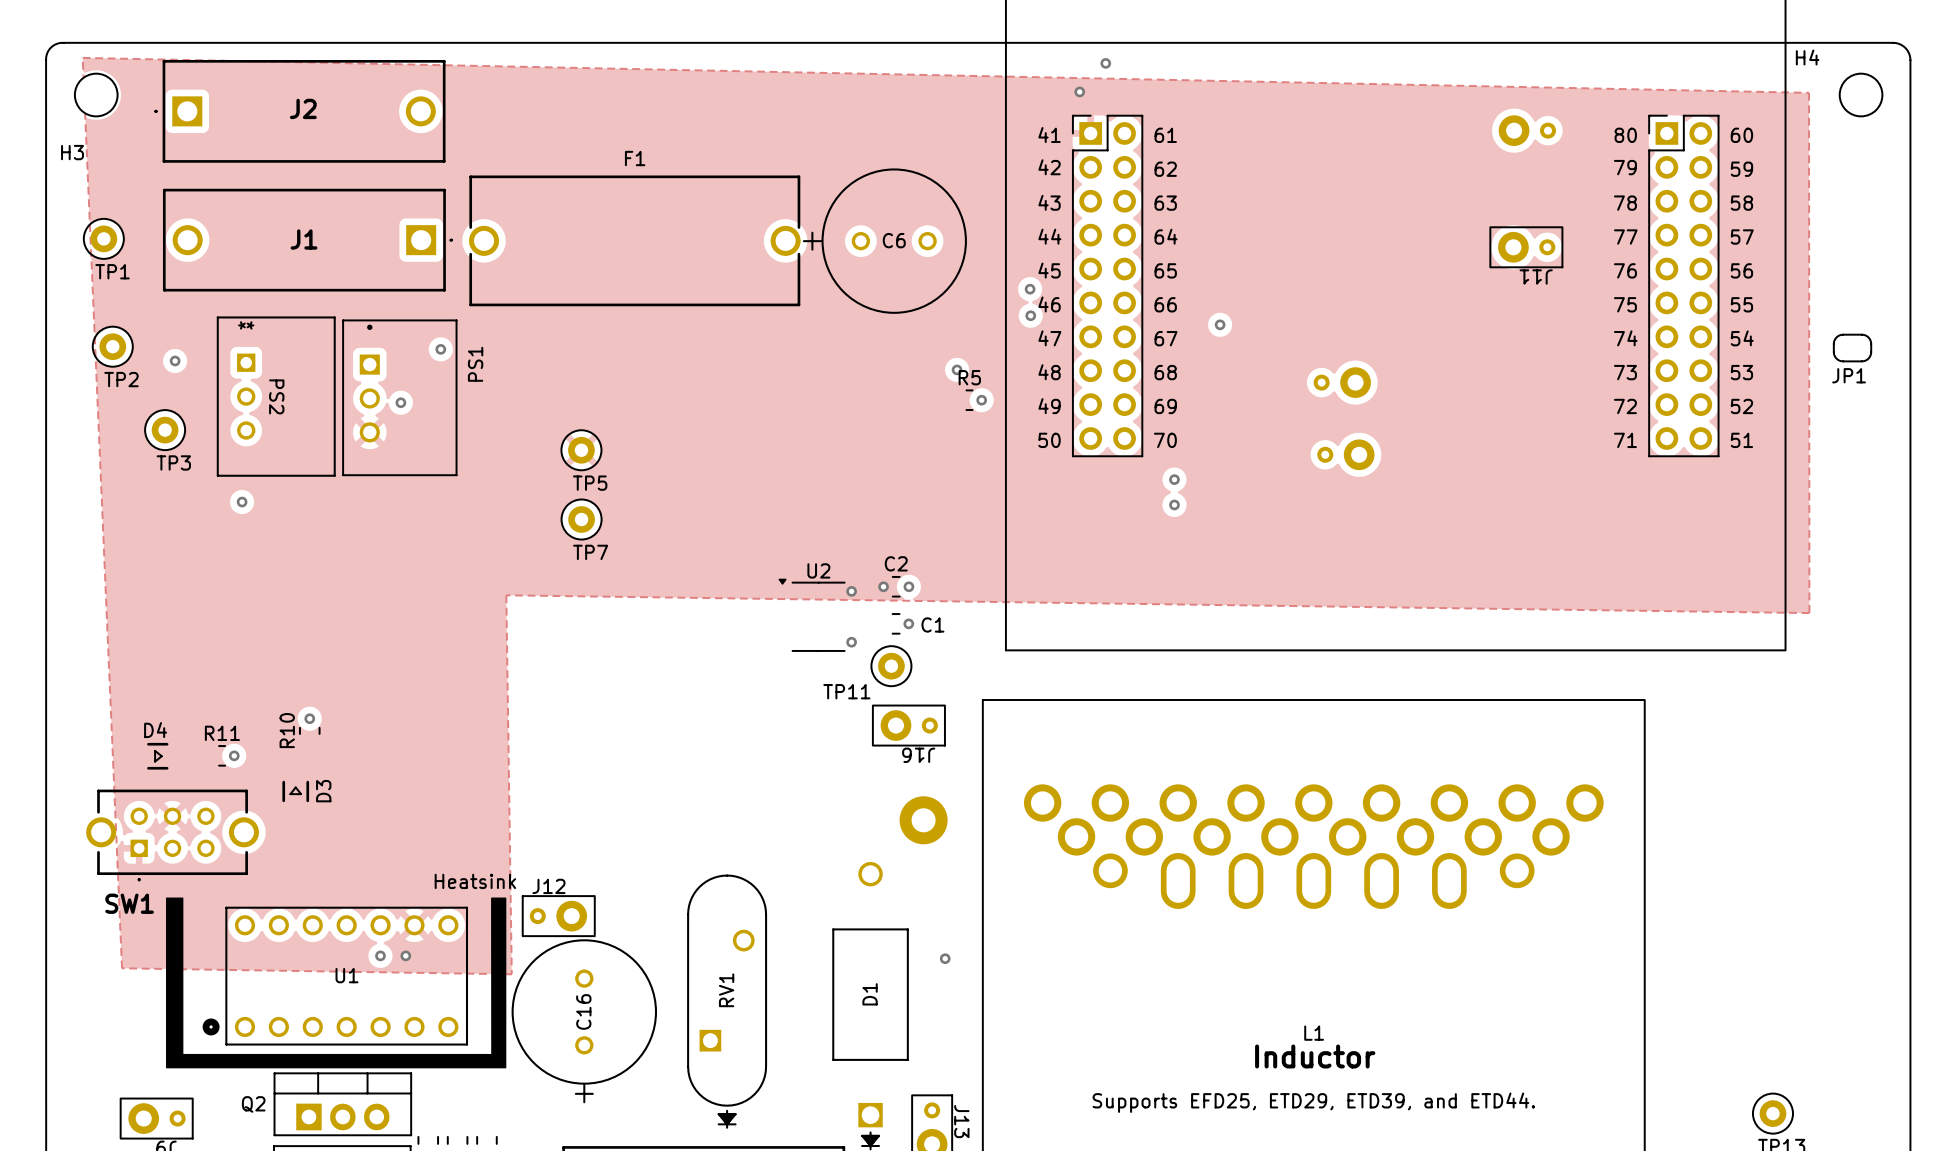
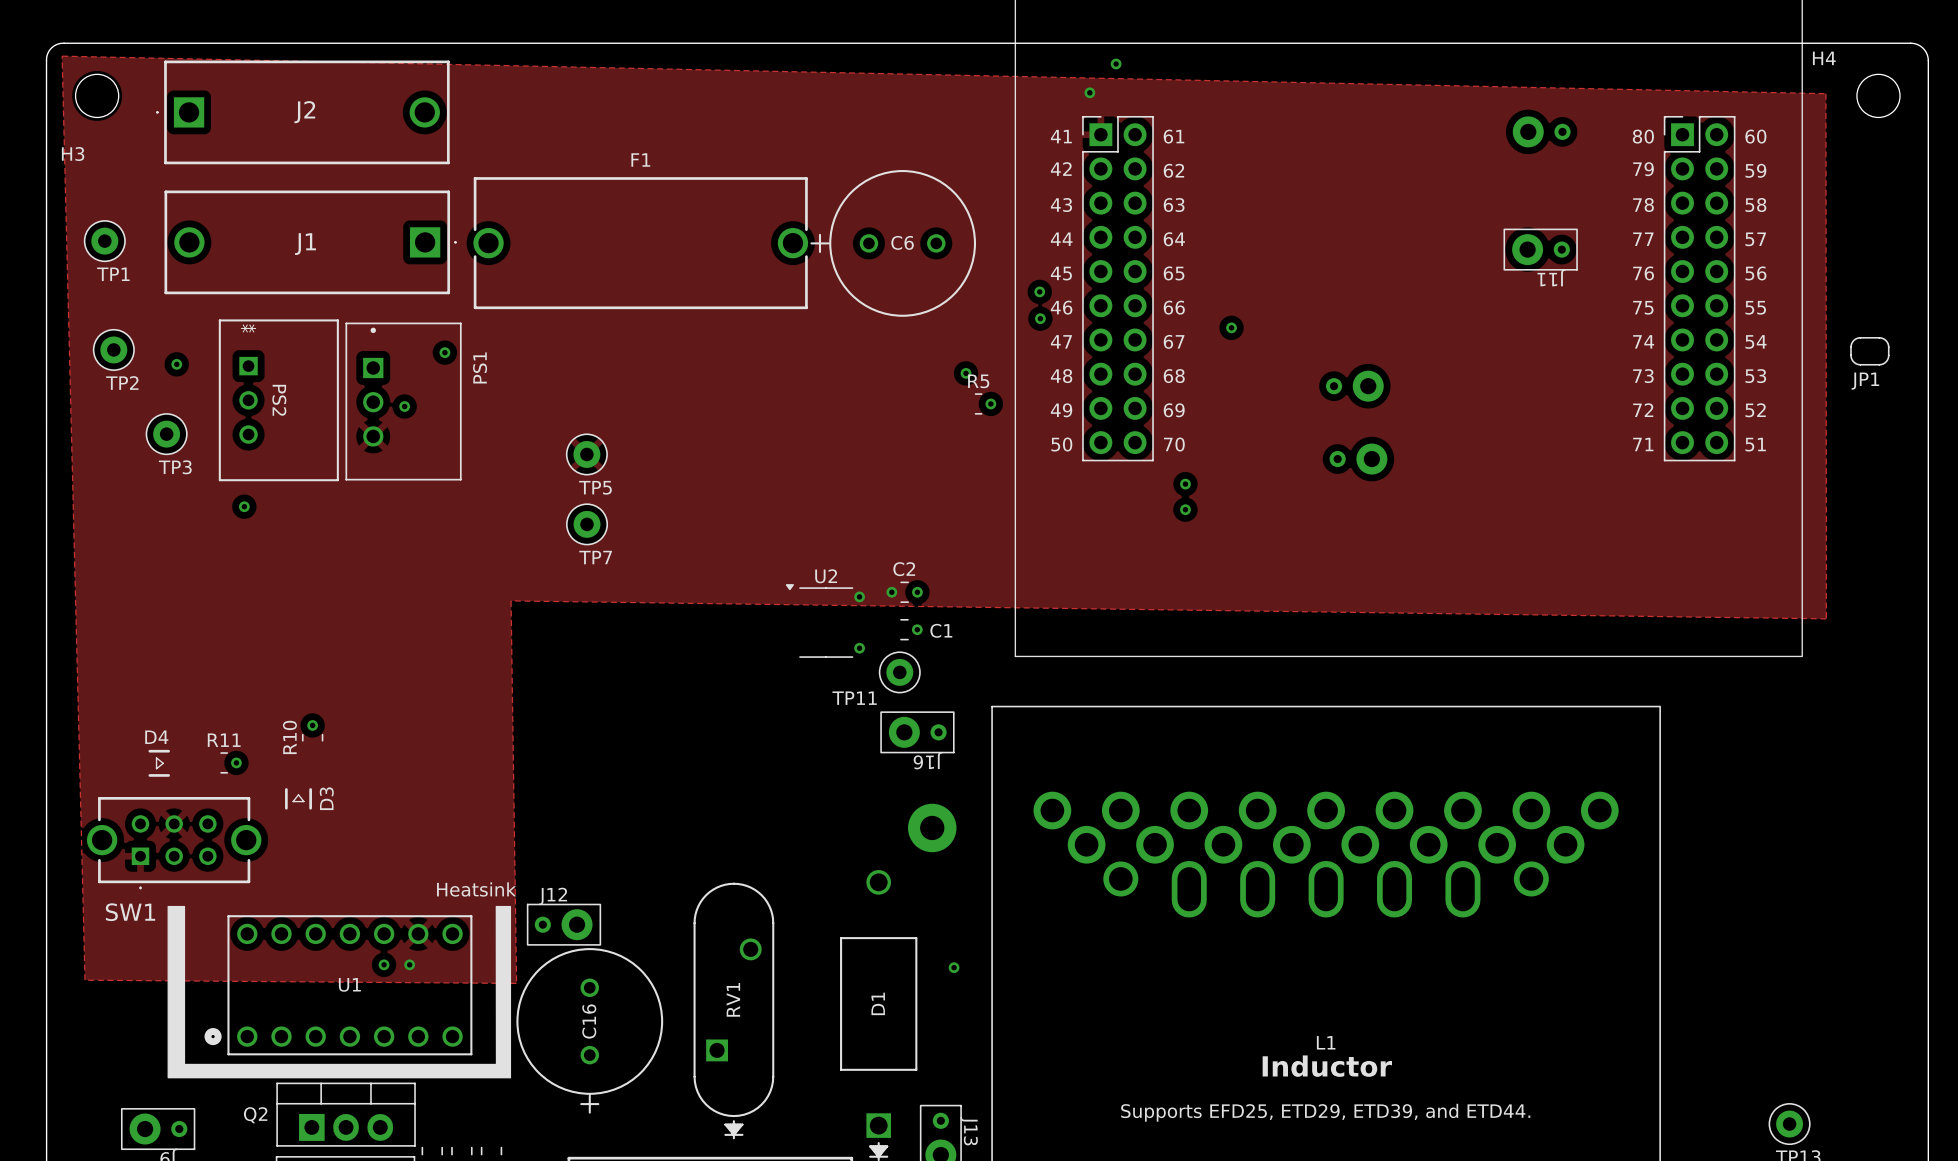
zone outline: (1809, 92) (82, 57) (122, 968) (511, 974) -> (1825, 93) (62, 56) (85, 980) (516, 983)

